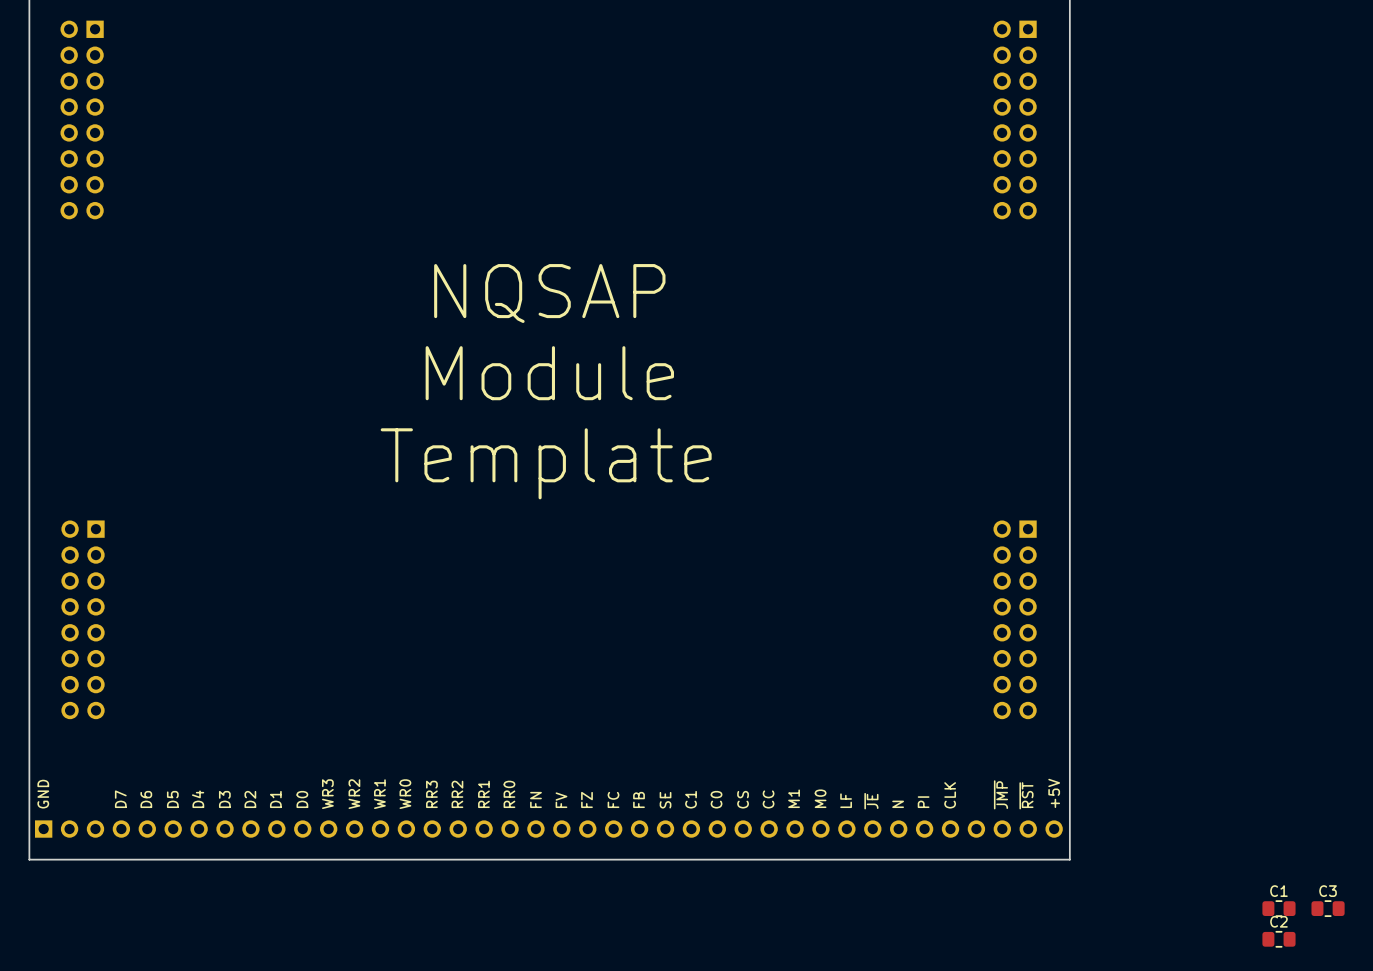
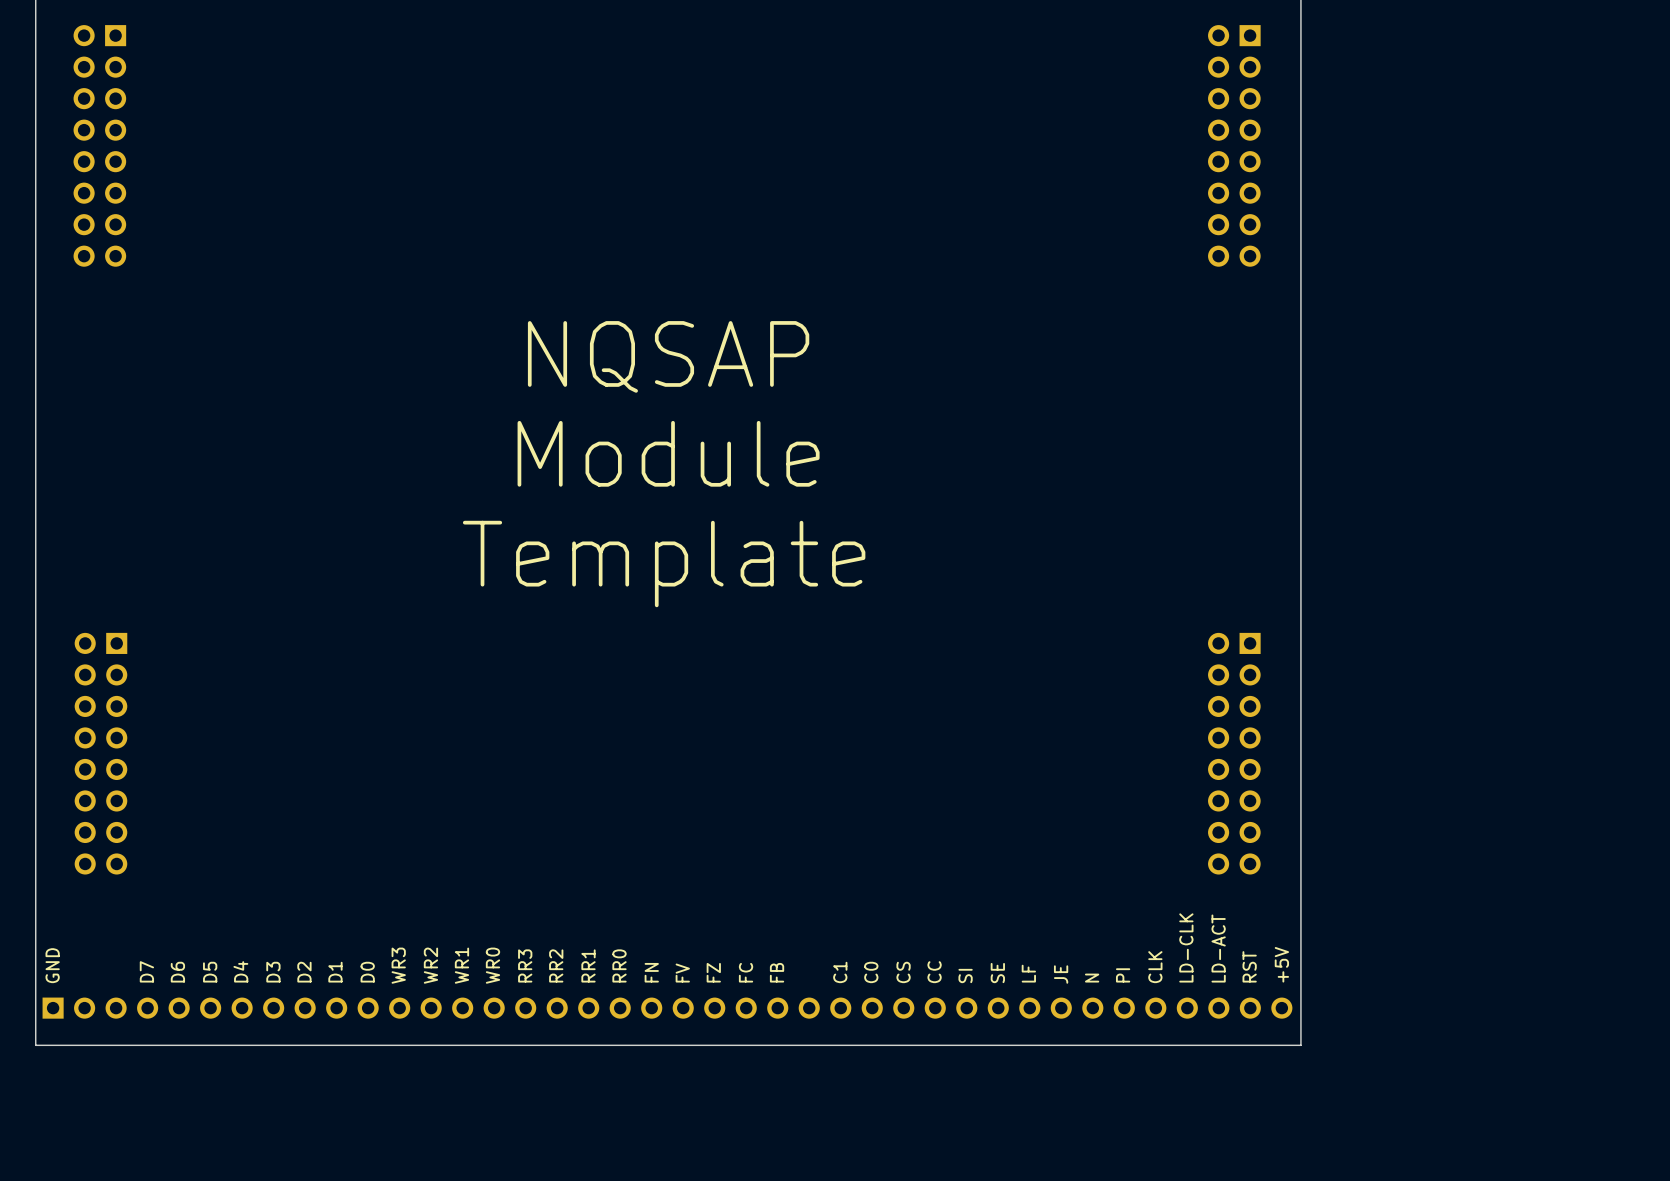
text: none -> LD-CLK (1186, 947)
text: ~{JMP} (1000, 794) -> LD-ACT (1218, 948)
text: ~{RST} (1026, 795) -> RST (1249, 966)
text: M1 (794, 798) -> SI (965, 975)
text: M0 (820, 798) -> SE (997, 973)
text: SE (665, 800) -> none
text: ~{JE} (871, 801) -> JE (1061, 974)
C1: (1278, 908) -> none
C3: (1328, 908) -> none
C2: (1278, 939) -> none

